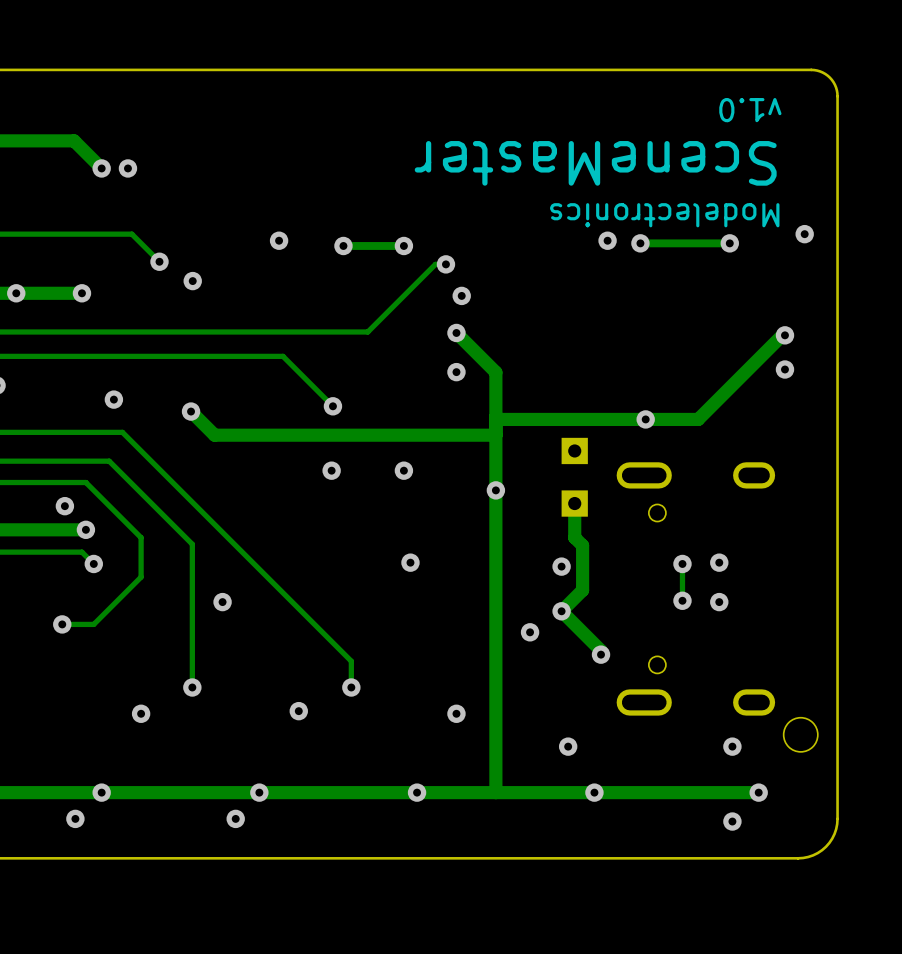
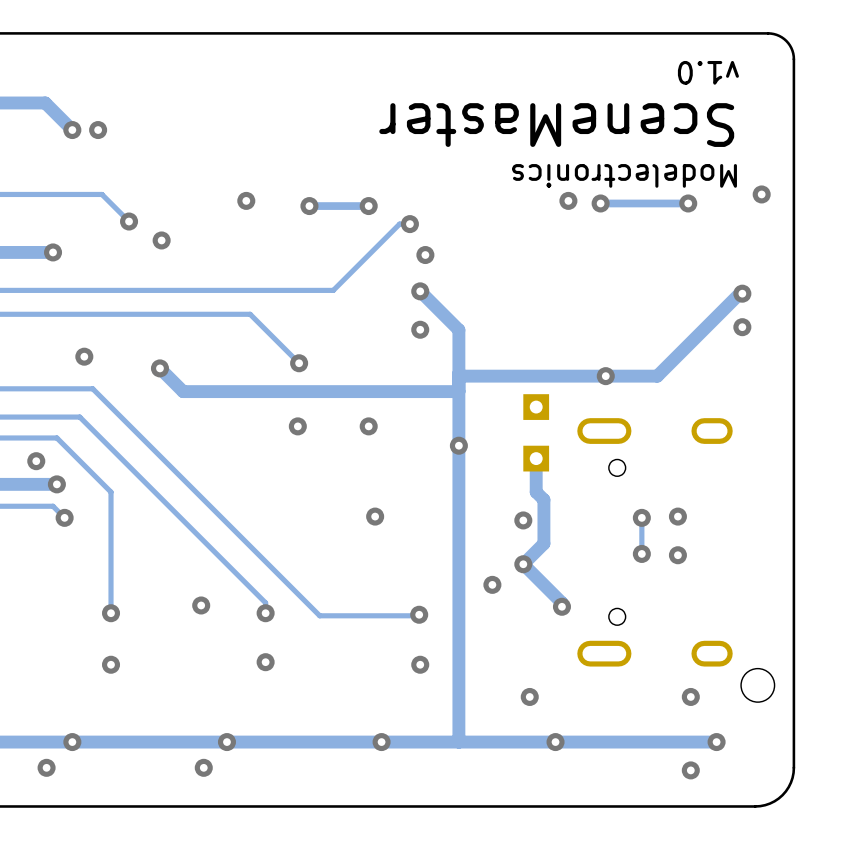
track: (192, 544) (192, 687) -> (161, 498) (265, 602) (265, 613)
track: (141, 577) (93, 624) (62, 624) -> (111, 530) (111, 613)
via: (222, 602) -> none
via: (62, 624) -> none
via: none -> (201, 605)
via: none -> (111, 613)
via: none -> (265, 613)
track: (351, 661) (351, 687) -> (317, 613) (319, 615) (419, 614)
via: none -> (419, 614)
via: (192, 687) -> none
via: (351, 687) -> none

